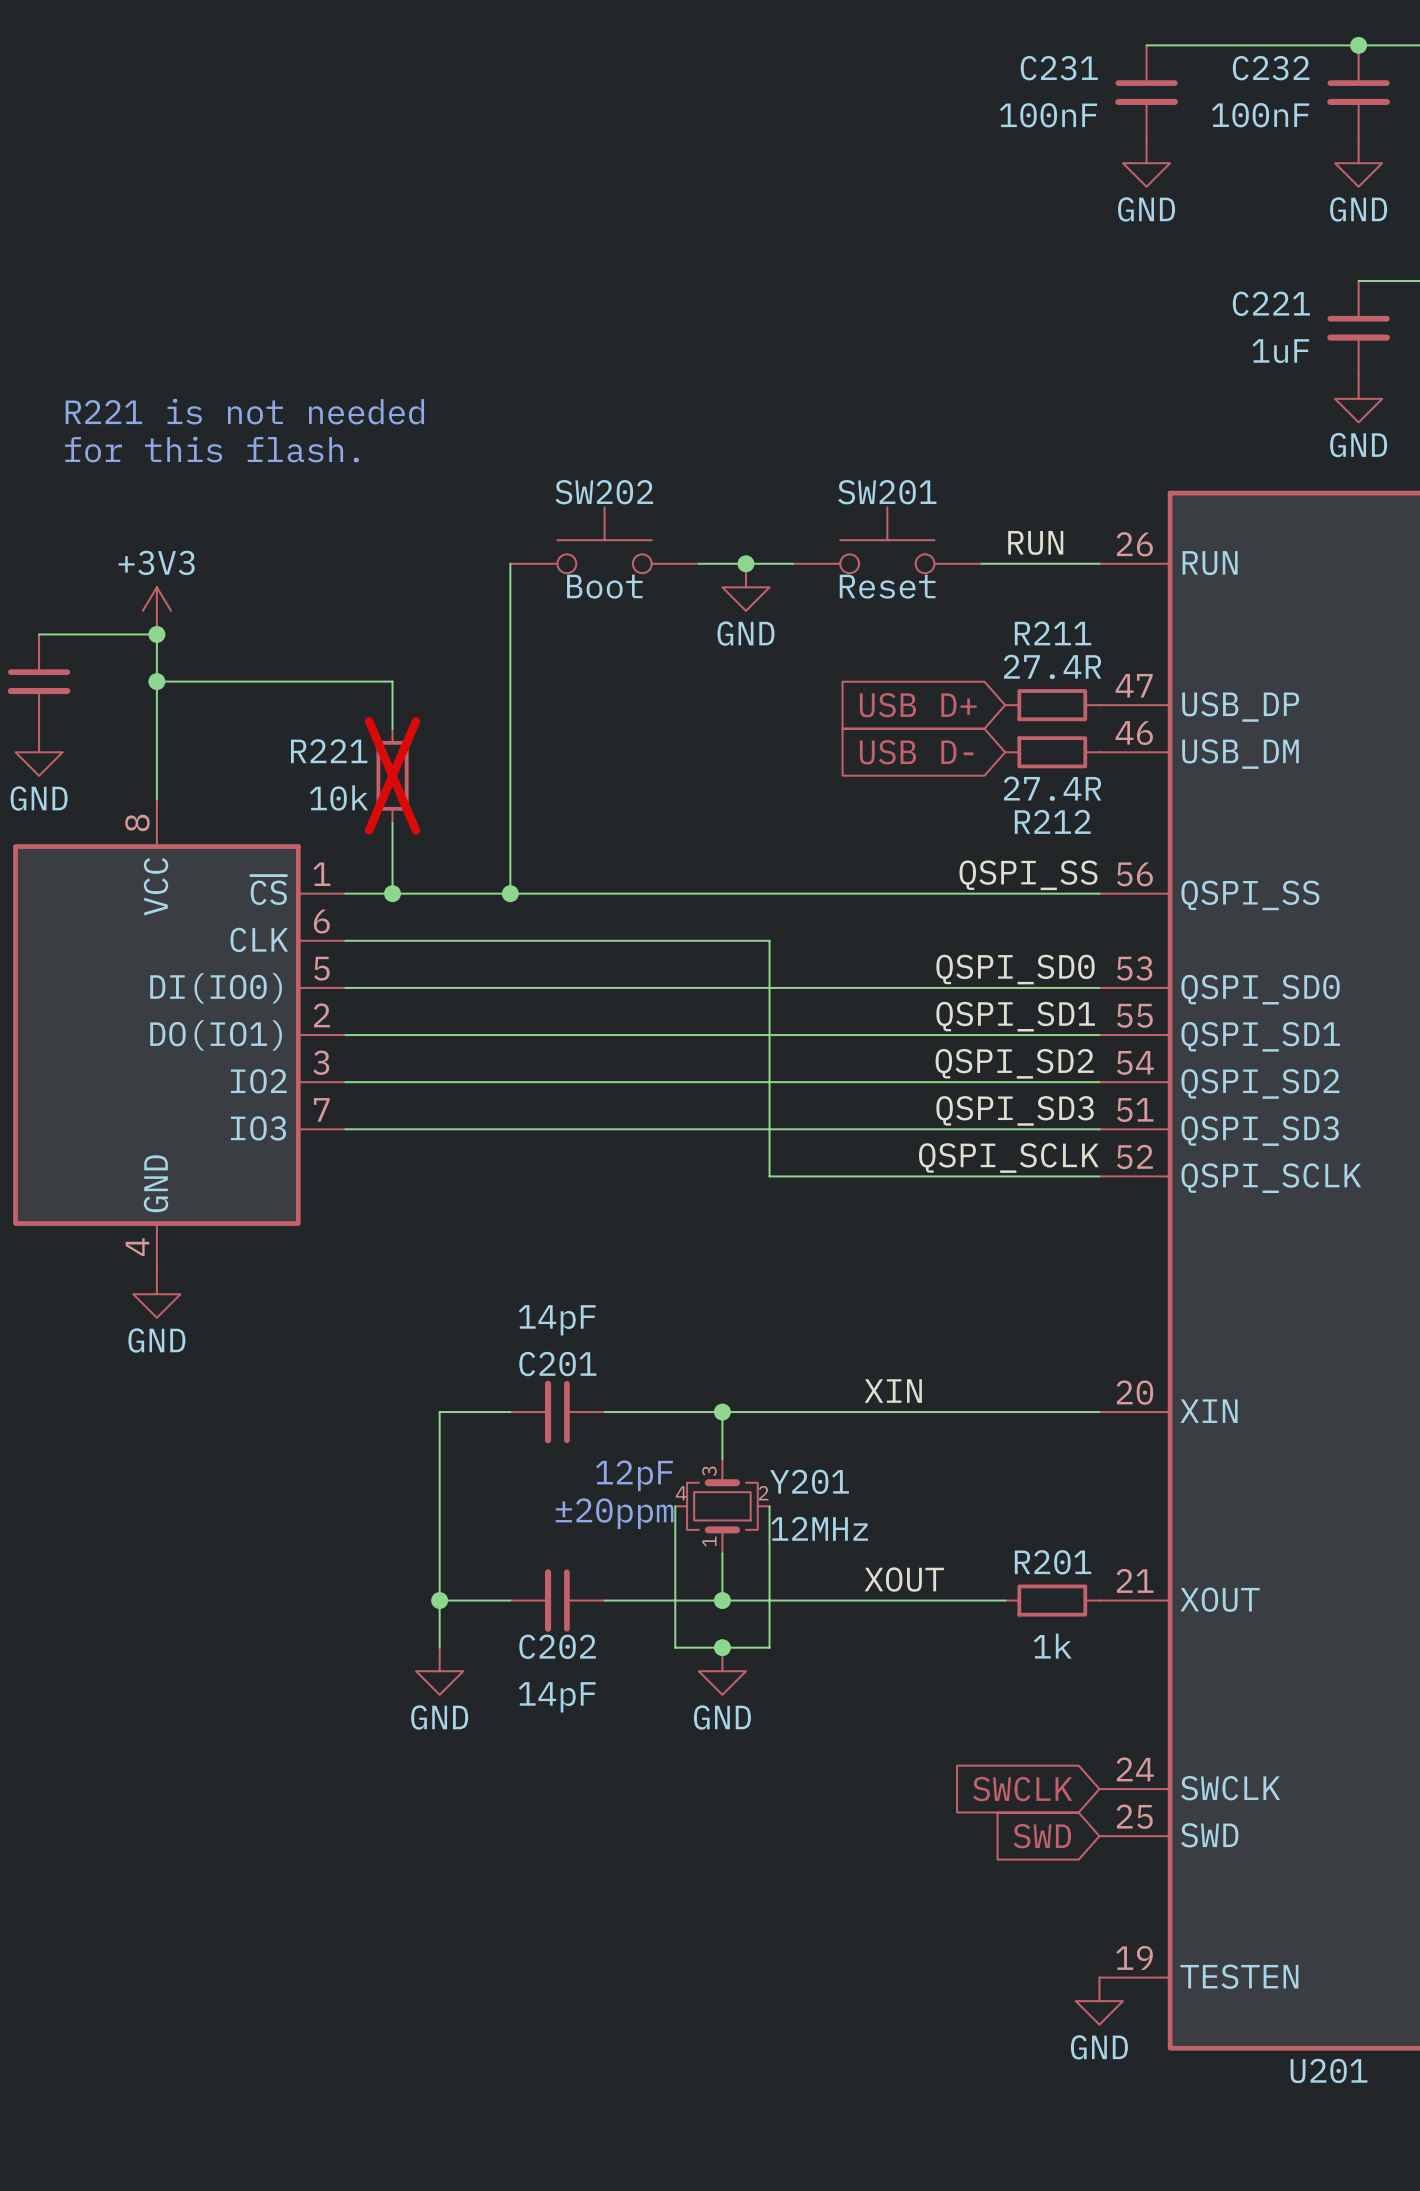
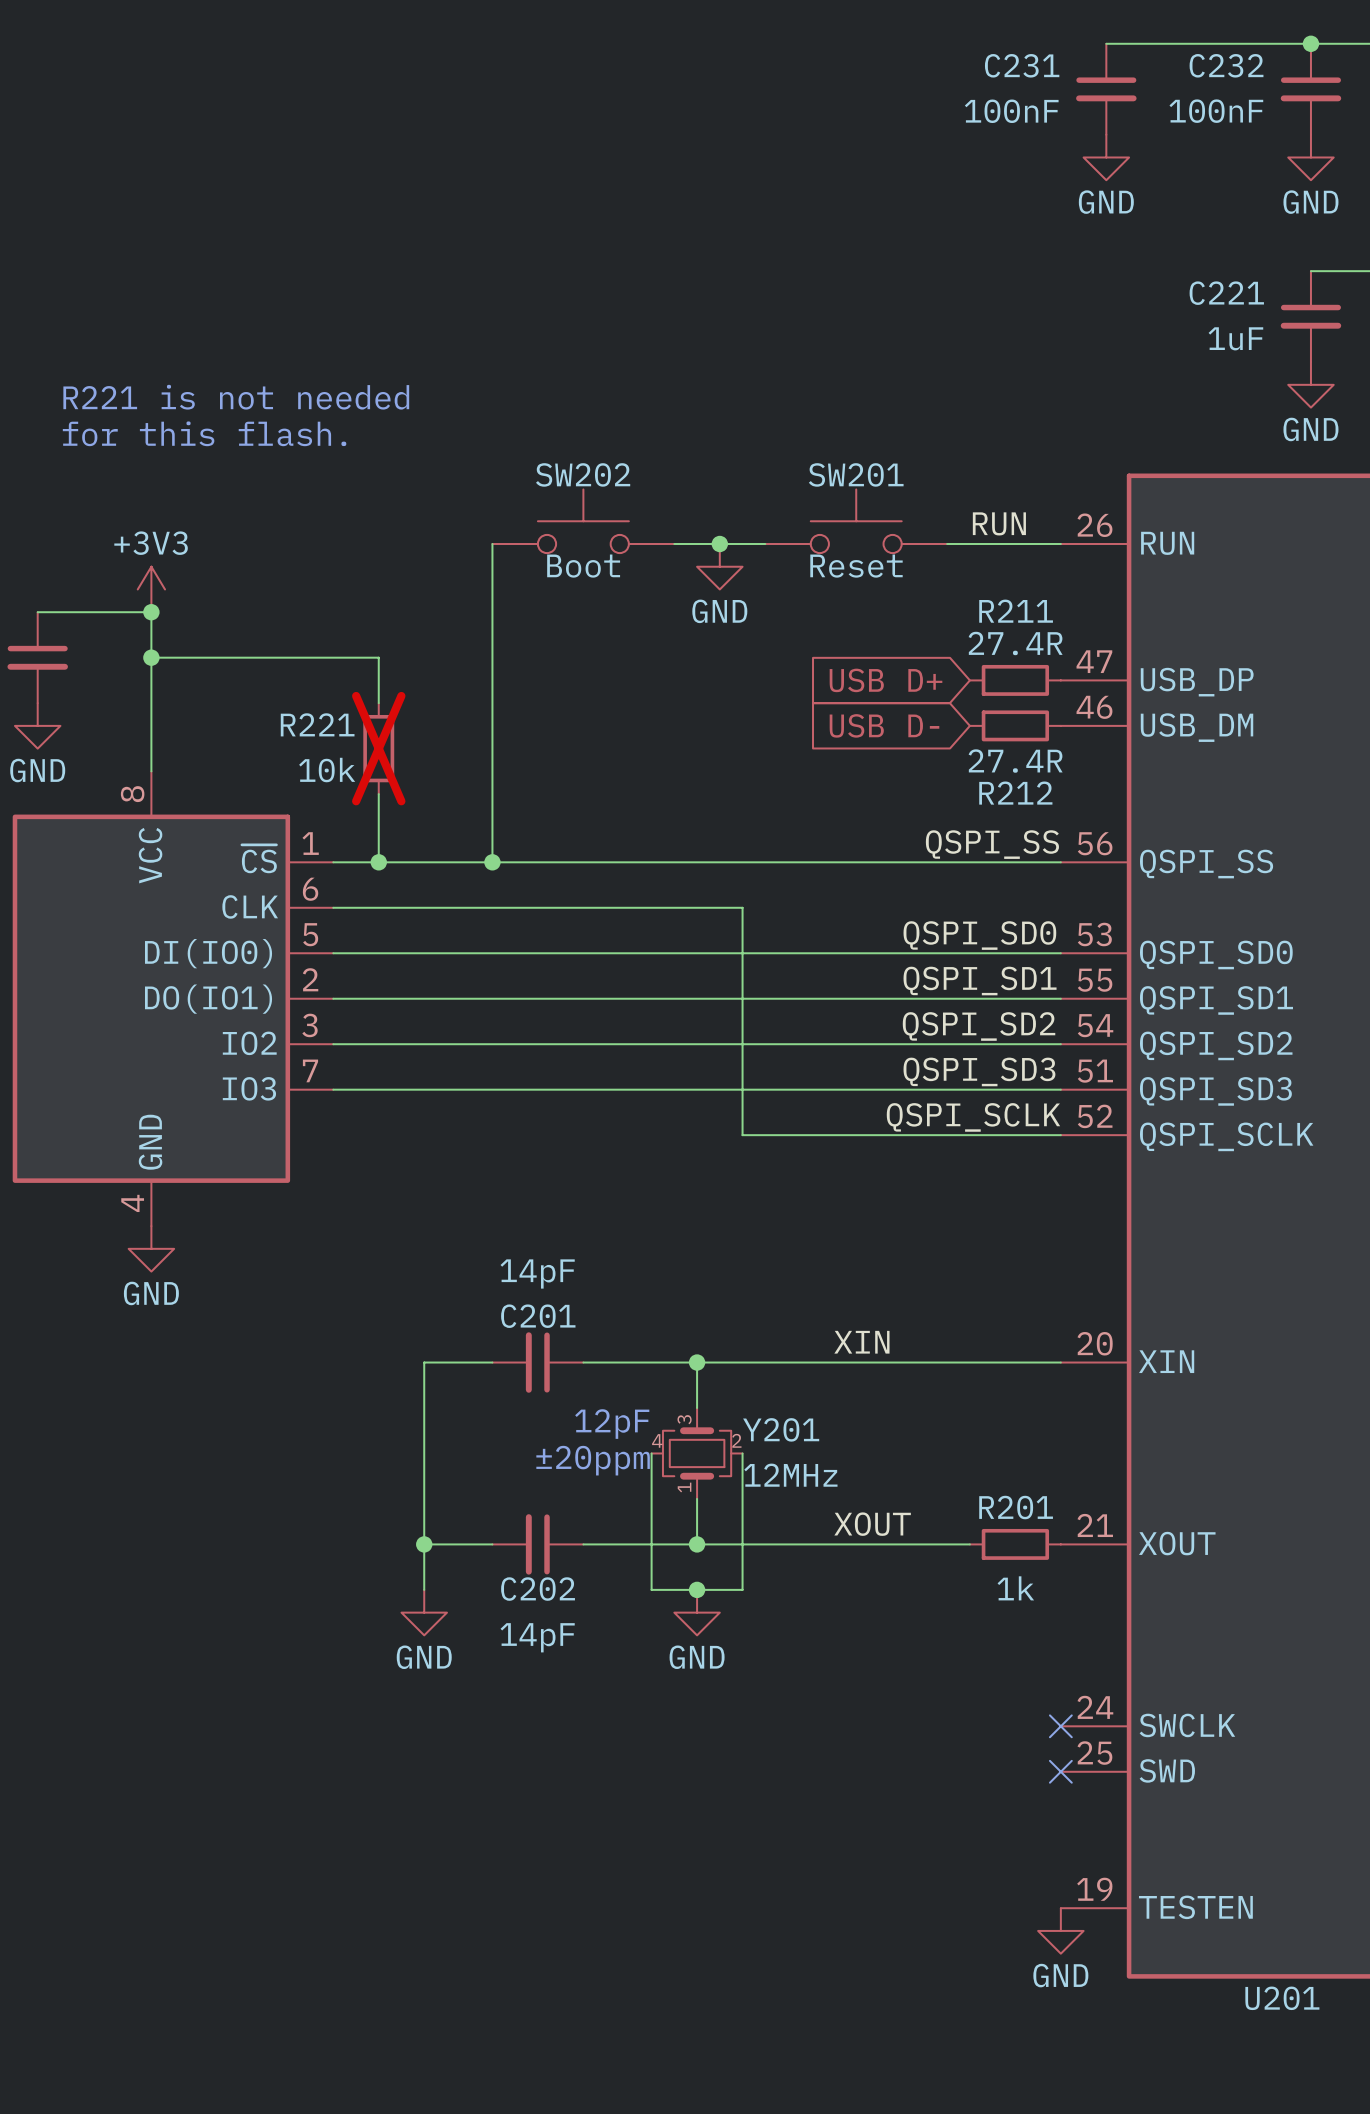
global label: SWCLK (1022, 1789) -> none
no-connect mark: none -> (1060, 1726)
global label: SWD (1042, 1836) -> none
no-connect mark: none -> (1060, 1771)

